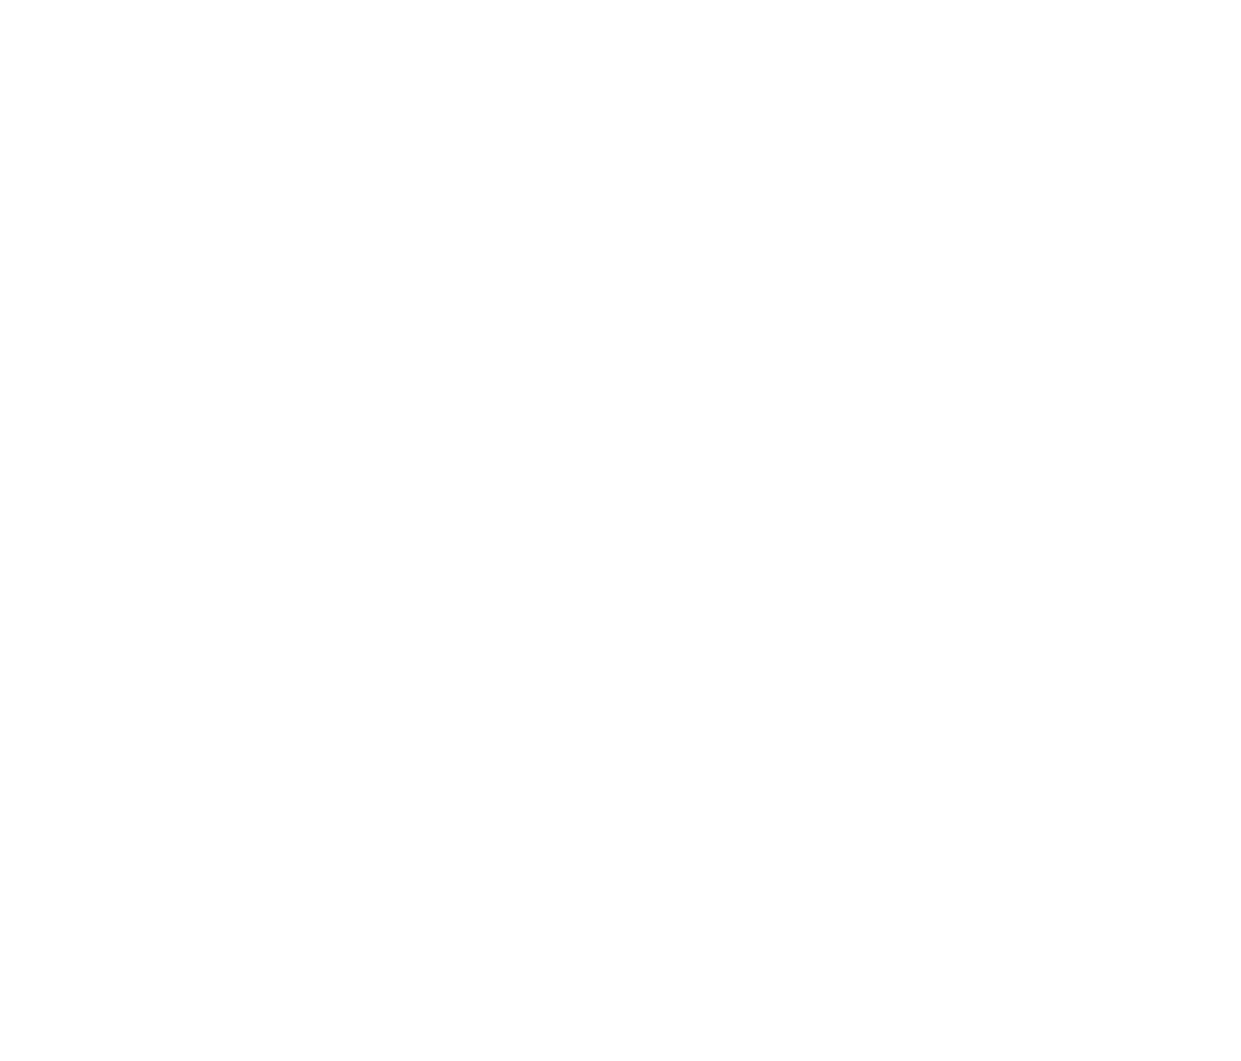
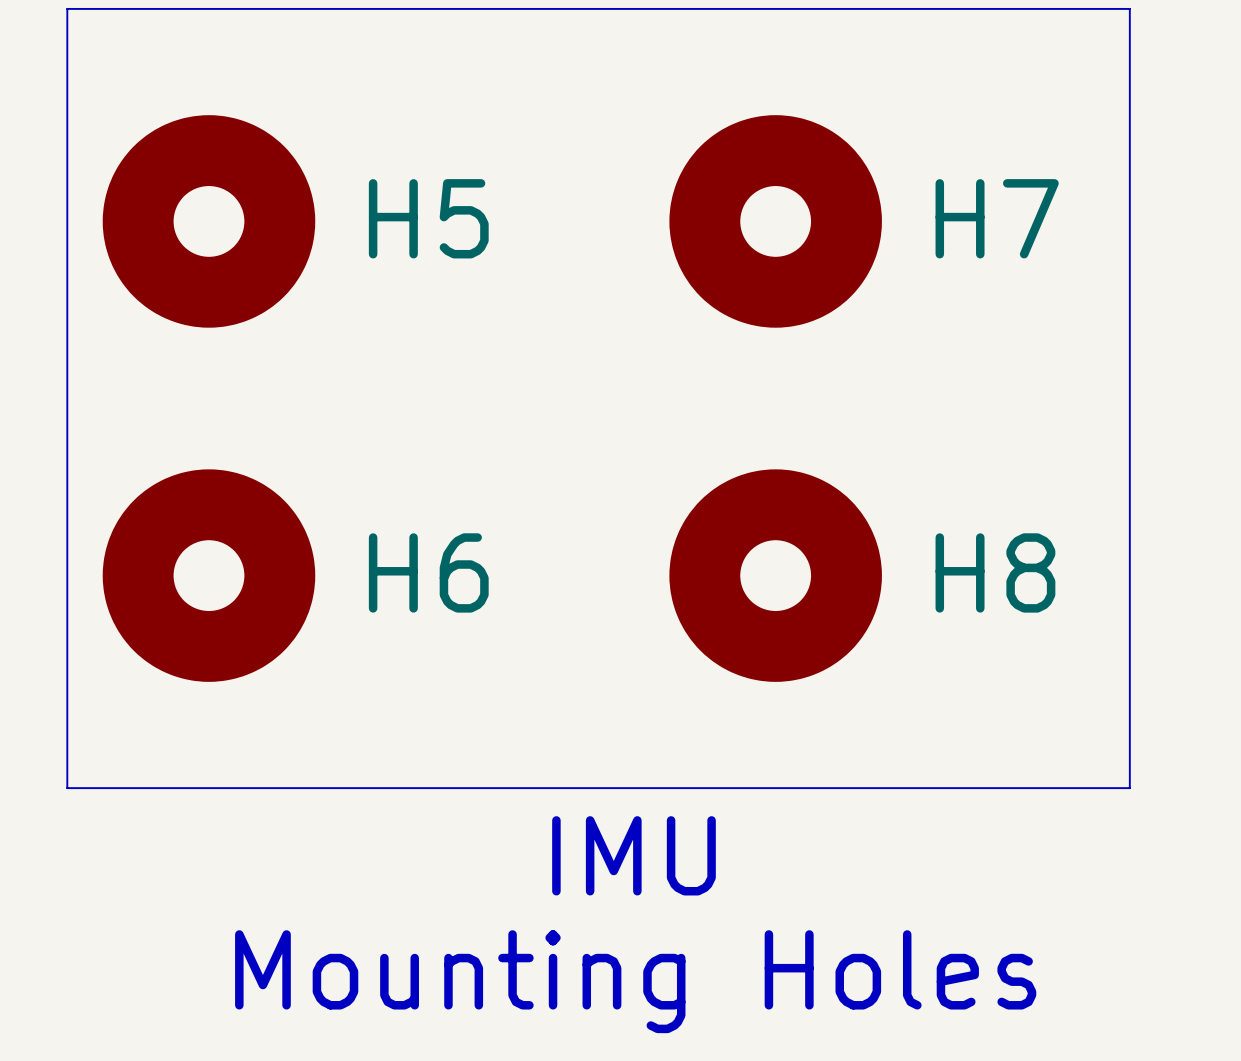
line: none -> (67, 8) (1129, 8) (1129, 788) (67, 788) (67, 8)
H5: none -> (208, 221)
H7: none -> (775, 221)
H6: none -> (208, 575)
H8: none -> (775, 575)
text: none -> IMU (633, 855)
text: none -> Mounting Holes (635, 981)

